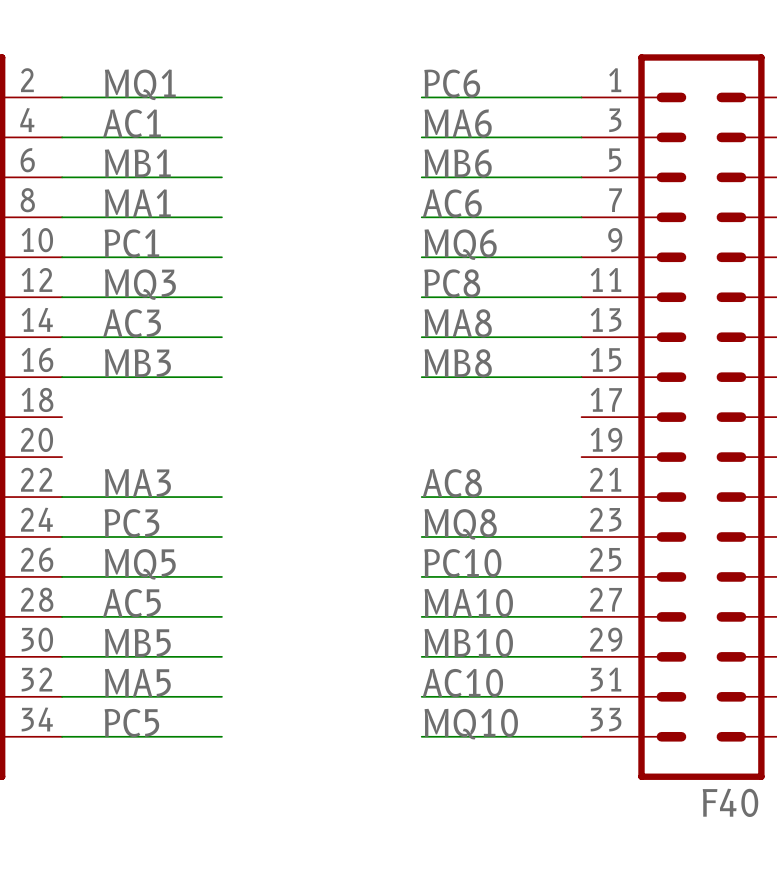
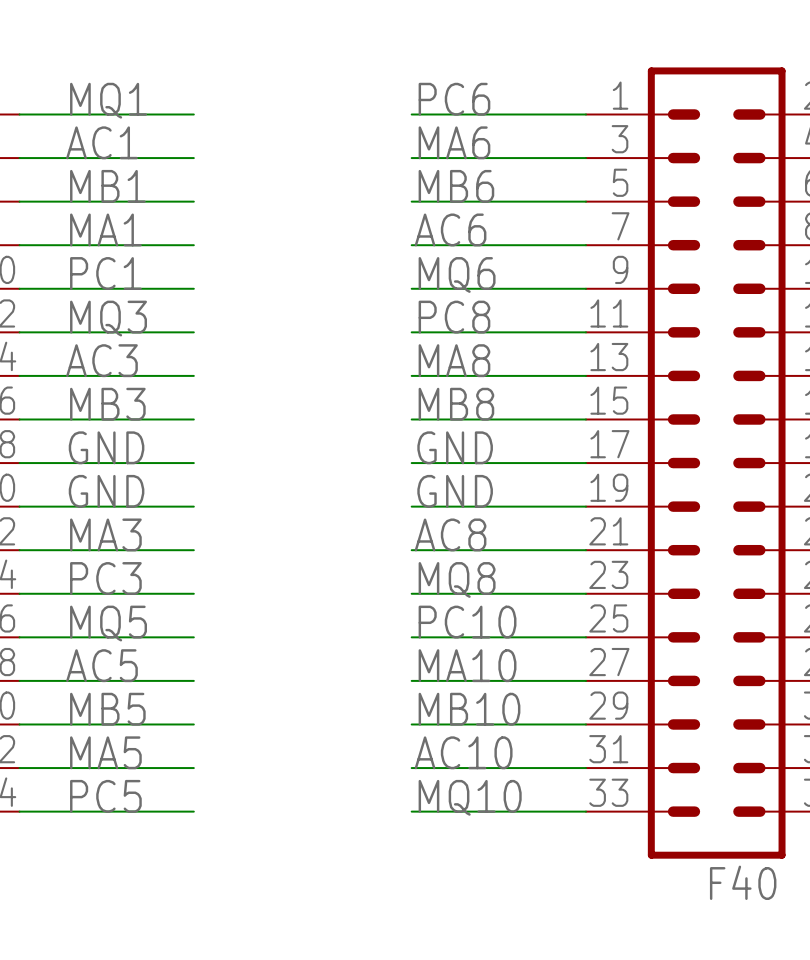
label: none -> GND (106, 447)
label: none -> GND (455, 447)
wire: none -> (19, 463) (193, 463)
wire: none -> (411, 463) (585, 463)
label: none -> GND (106, 491)
label: none -> GND (455, 491)
wire: none -> (19, 506) (193, 506)
wire: none -> (411, 506) (585, 506)

